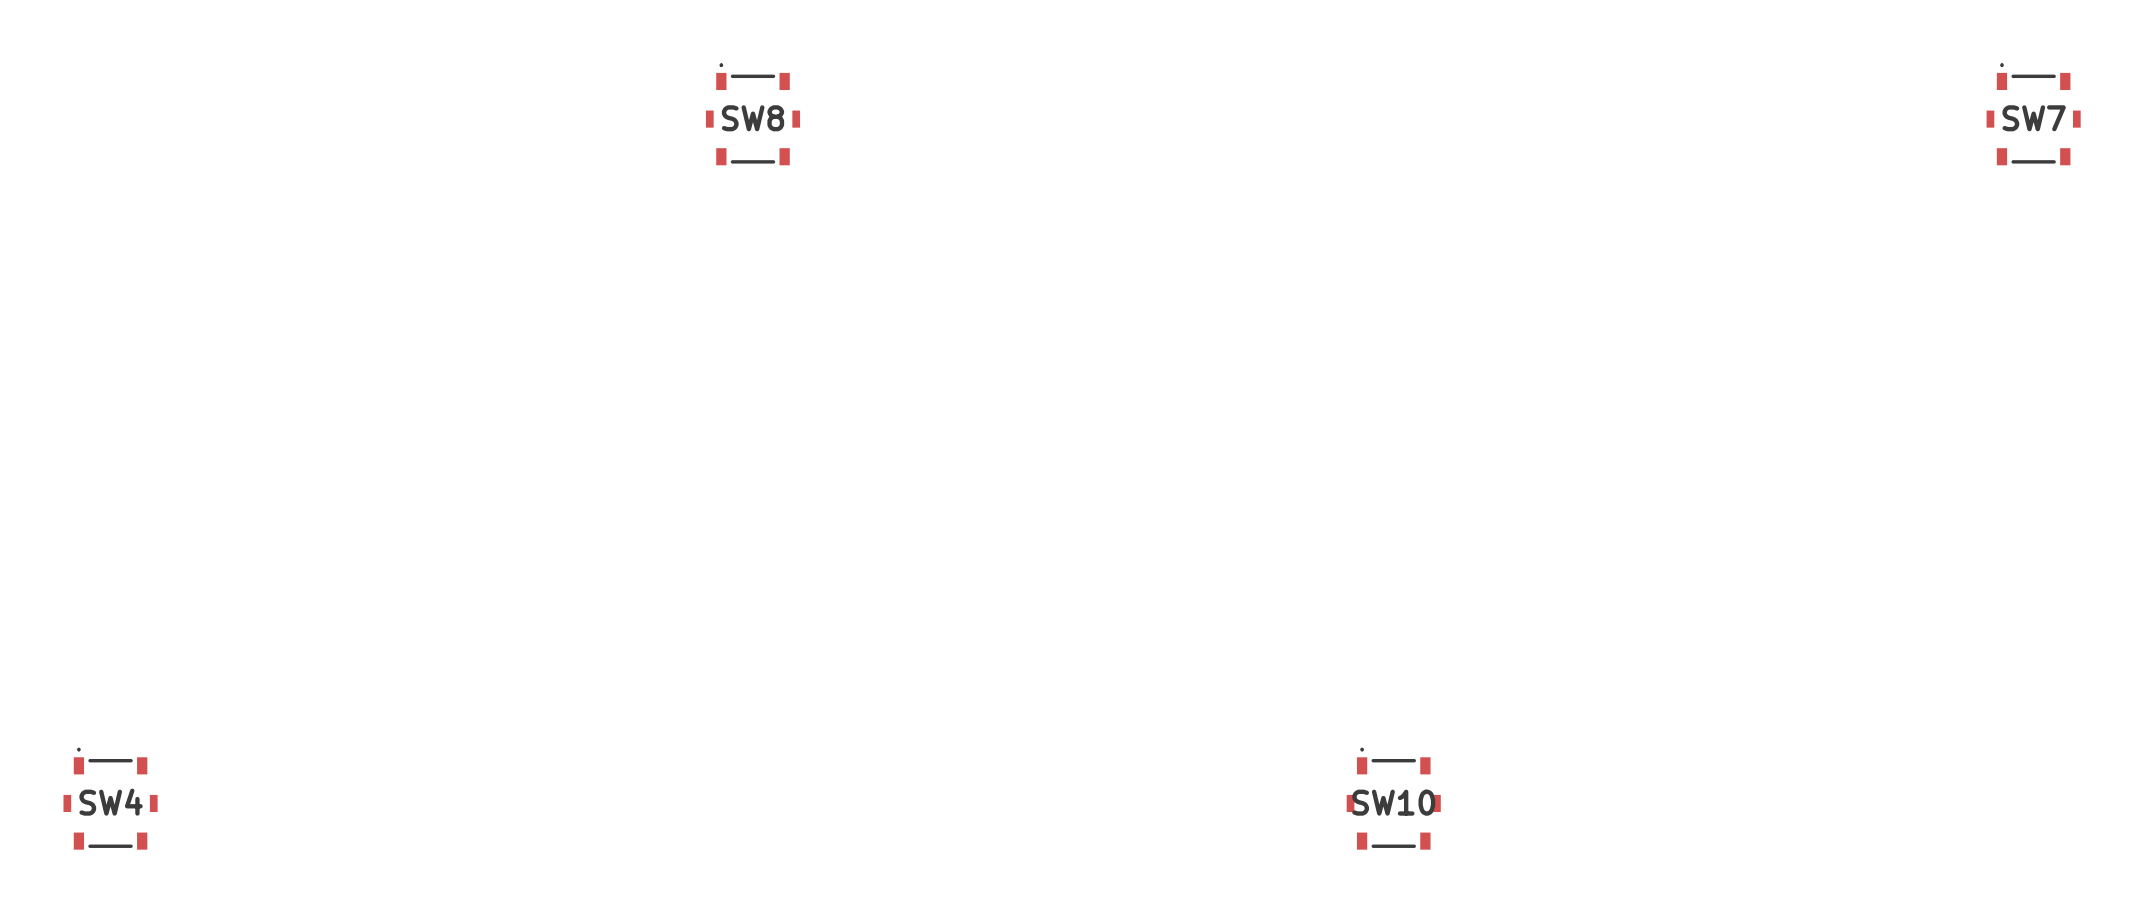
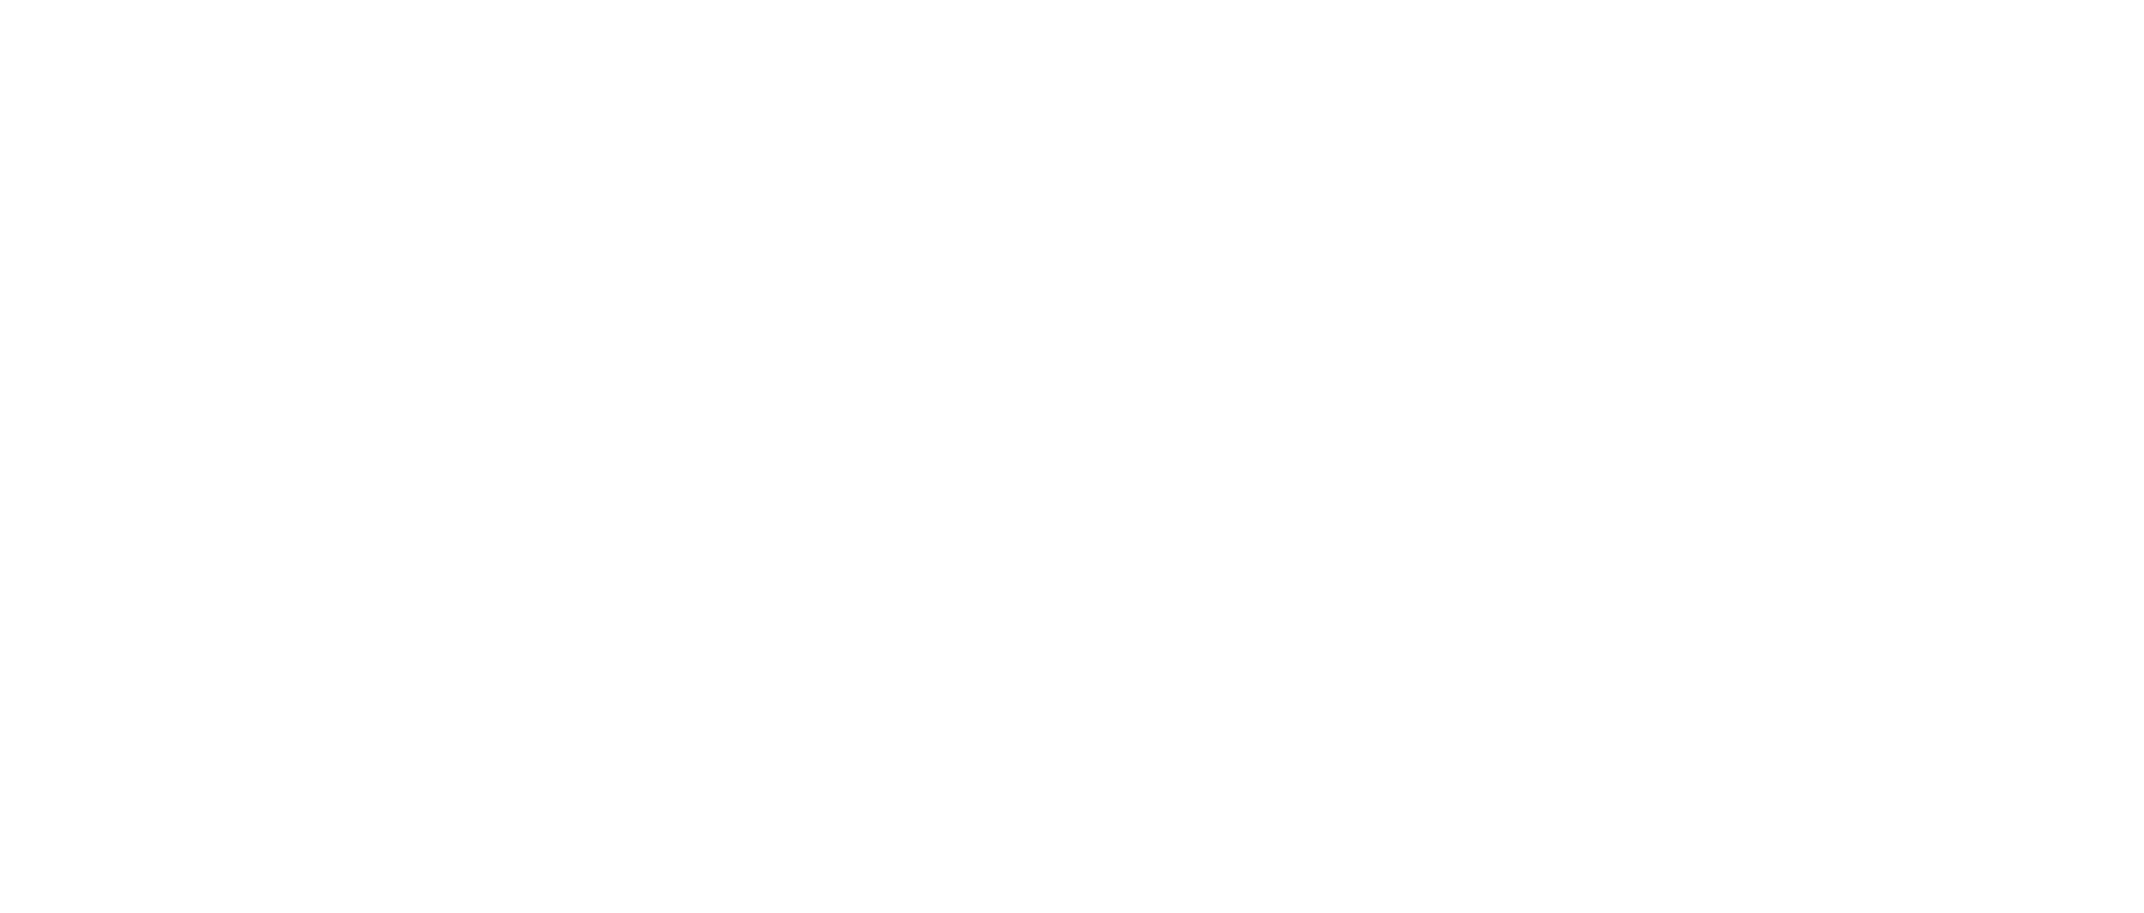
SW8: (753, 114) -> none
SW7: (2033, 114) -> none
SW4: (110, 798) -> none
SW10: (1393, 798) -> none

